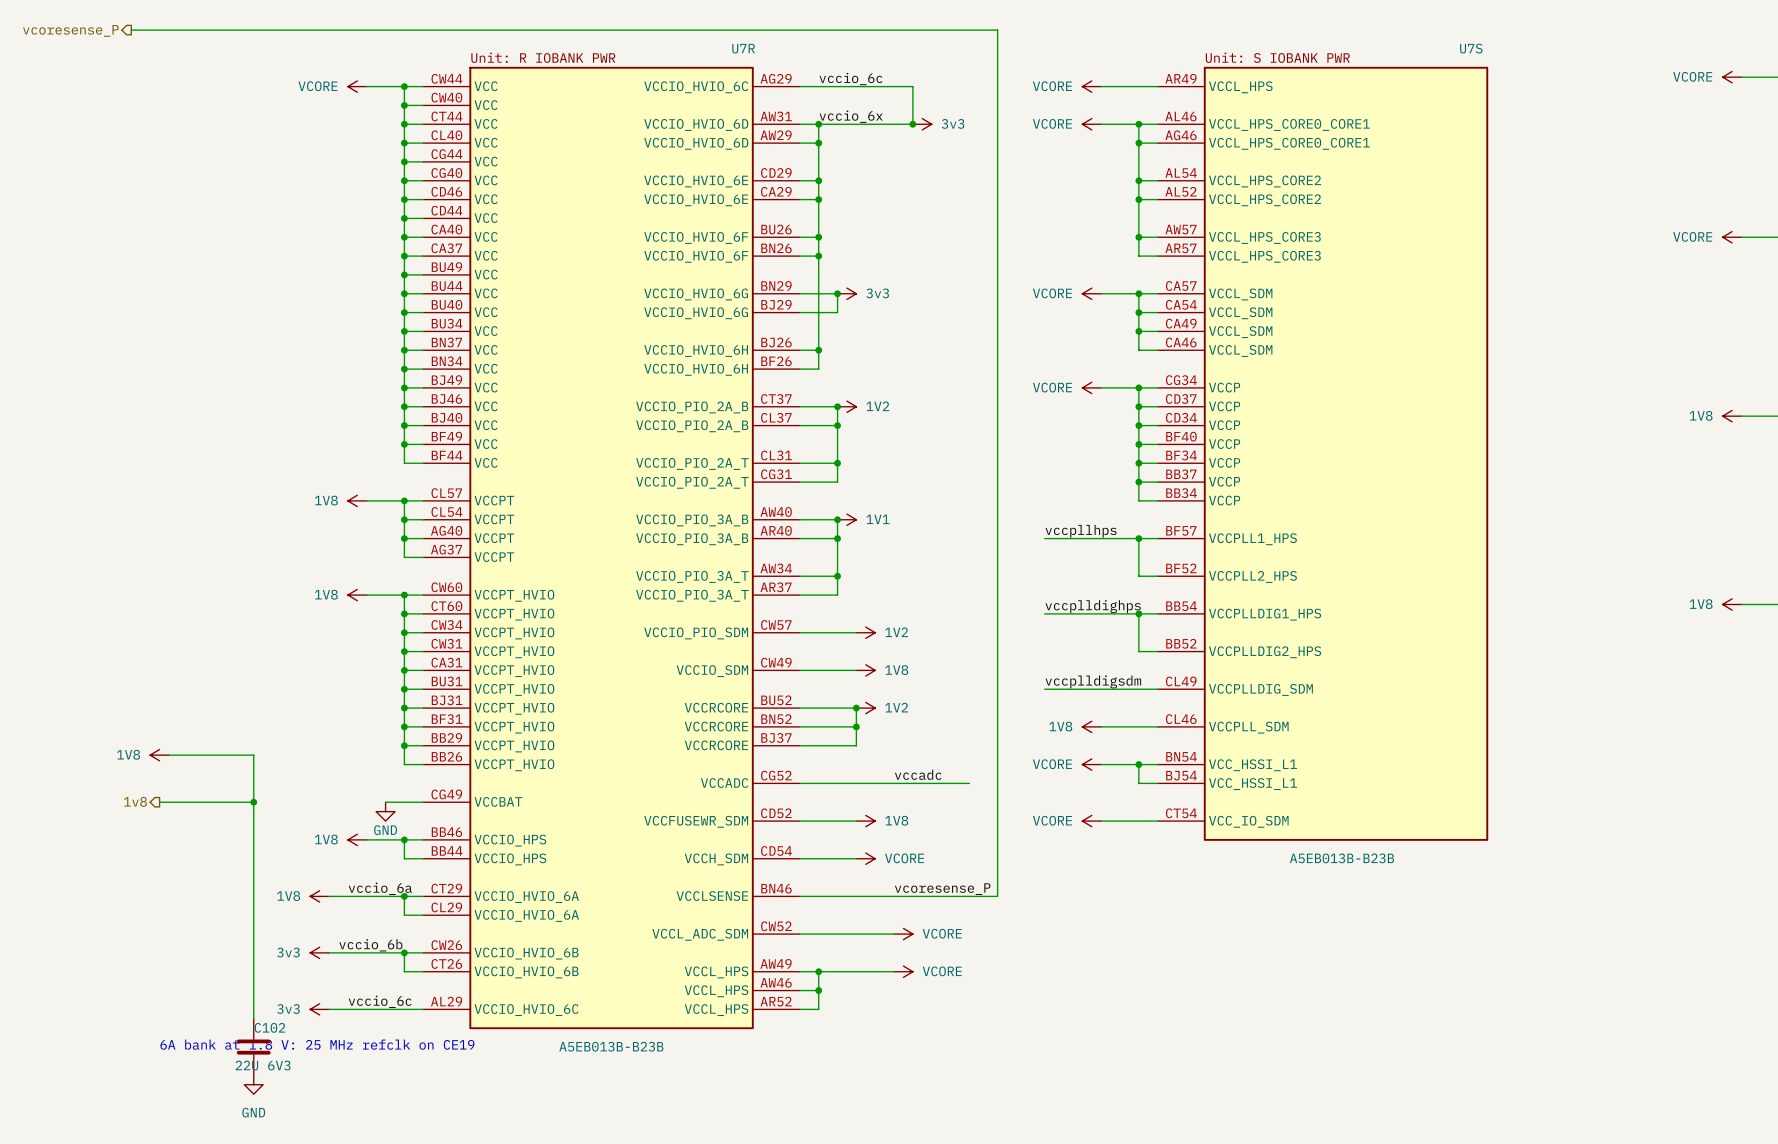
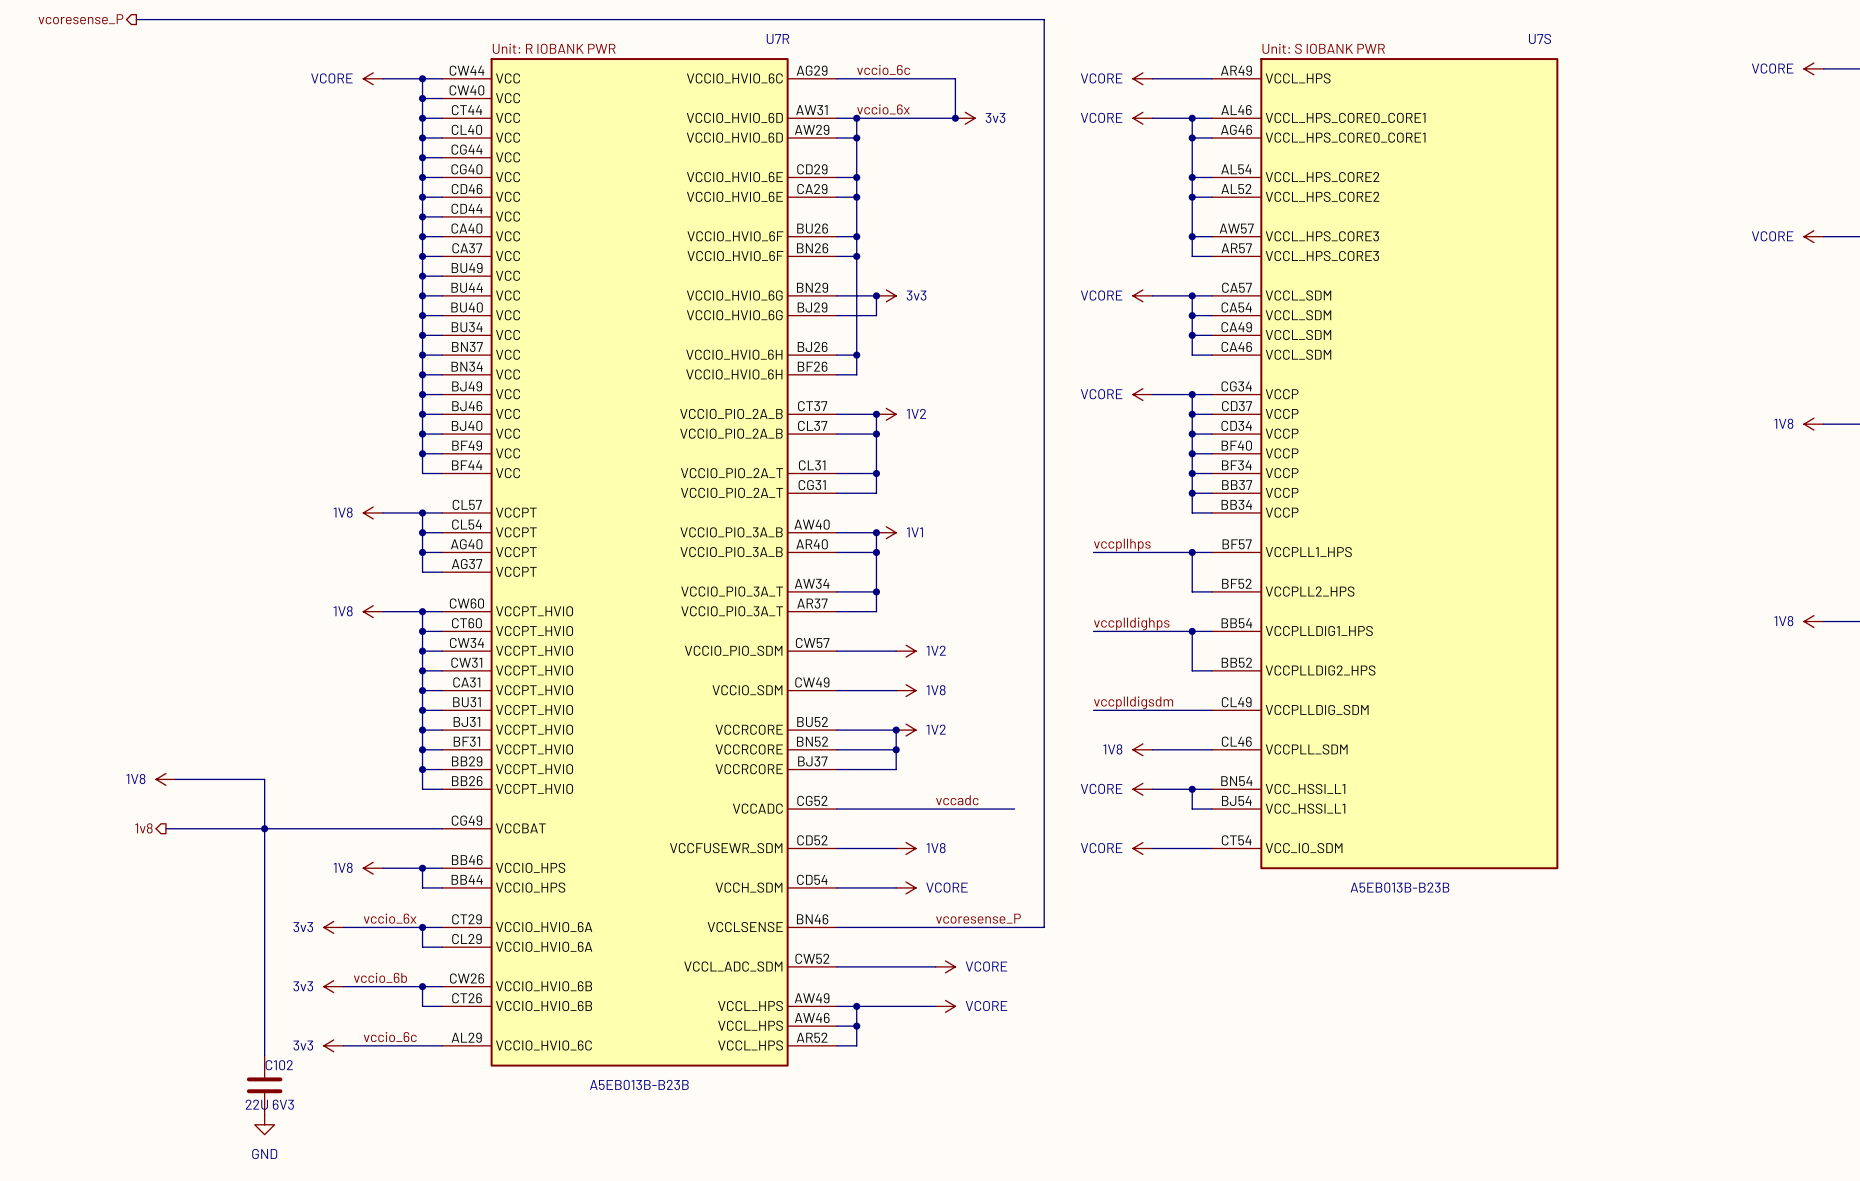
wire: none -> (264, 828) (402, 828)
power symbol: GND (385, 811) -> none
label: vccio_6a (380, 888) -> vccio_6x (390, 918)
power symbol: 1V8 (319, 896) -> 3v3 (333, 927)
text: 6A bank at 1.8 V: 25 MHz refclk on CE19 (317, 1044) -> none

